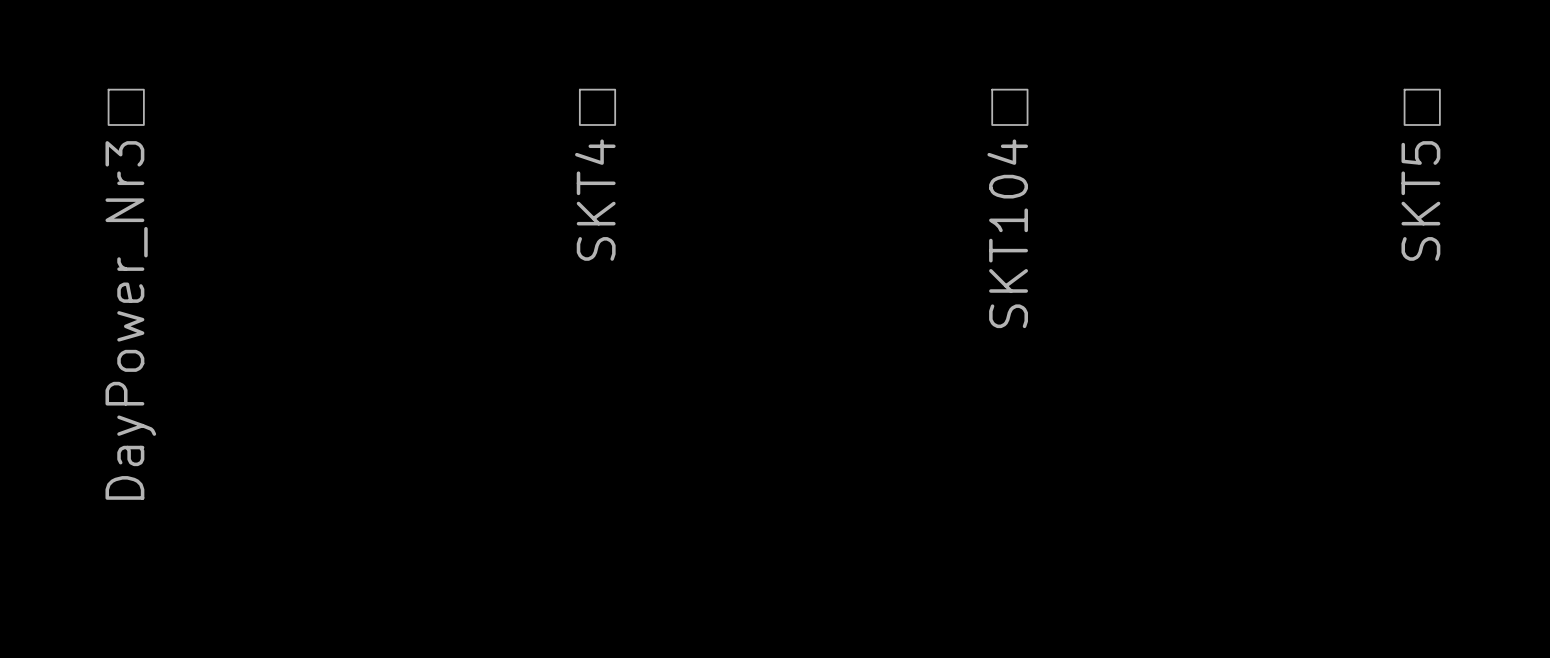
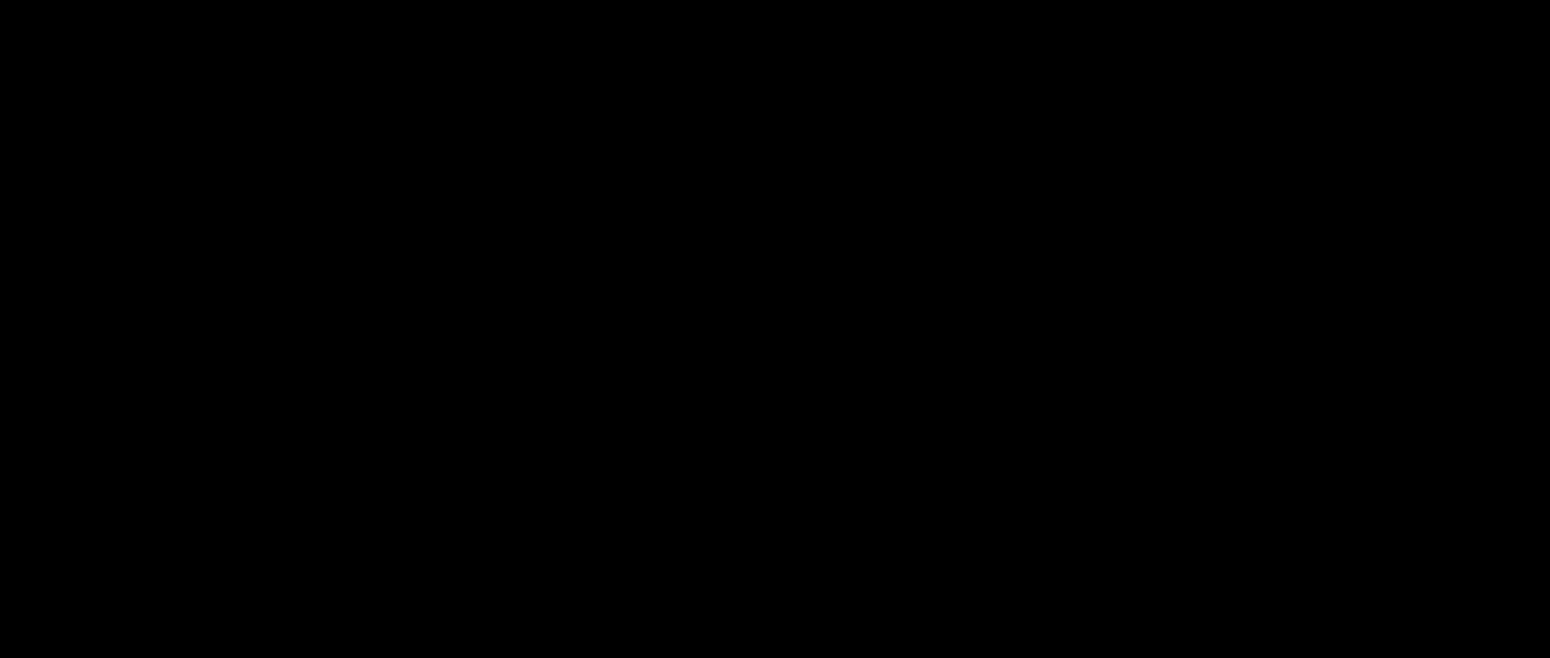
hierarchical label: SKT4 (595, 200) -> none
hierarchical label: SKT5 (1420, 200) -> none
hierarchical label: SKT104 (1007, 233) -> none
hierarchical label: DayPower_Nr3 (130, 320) -> none

